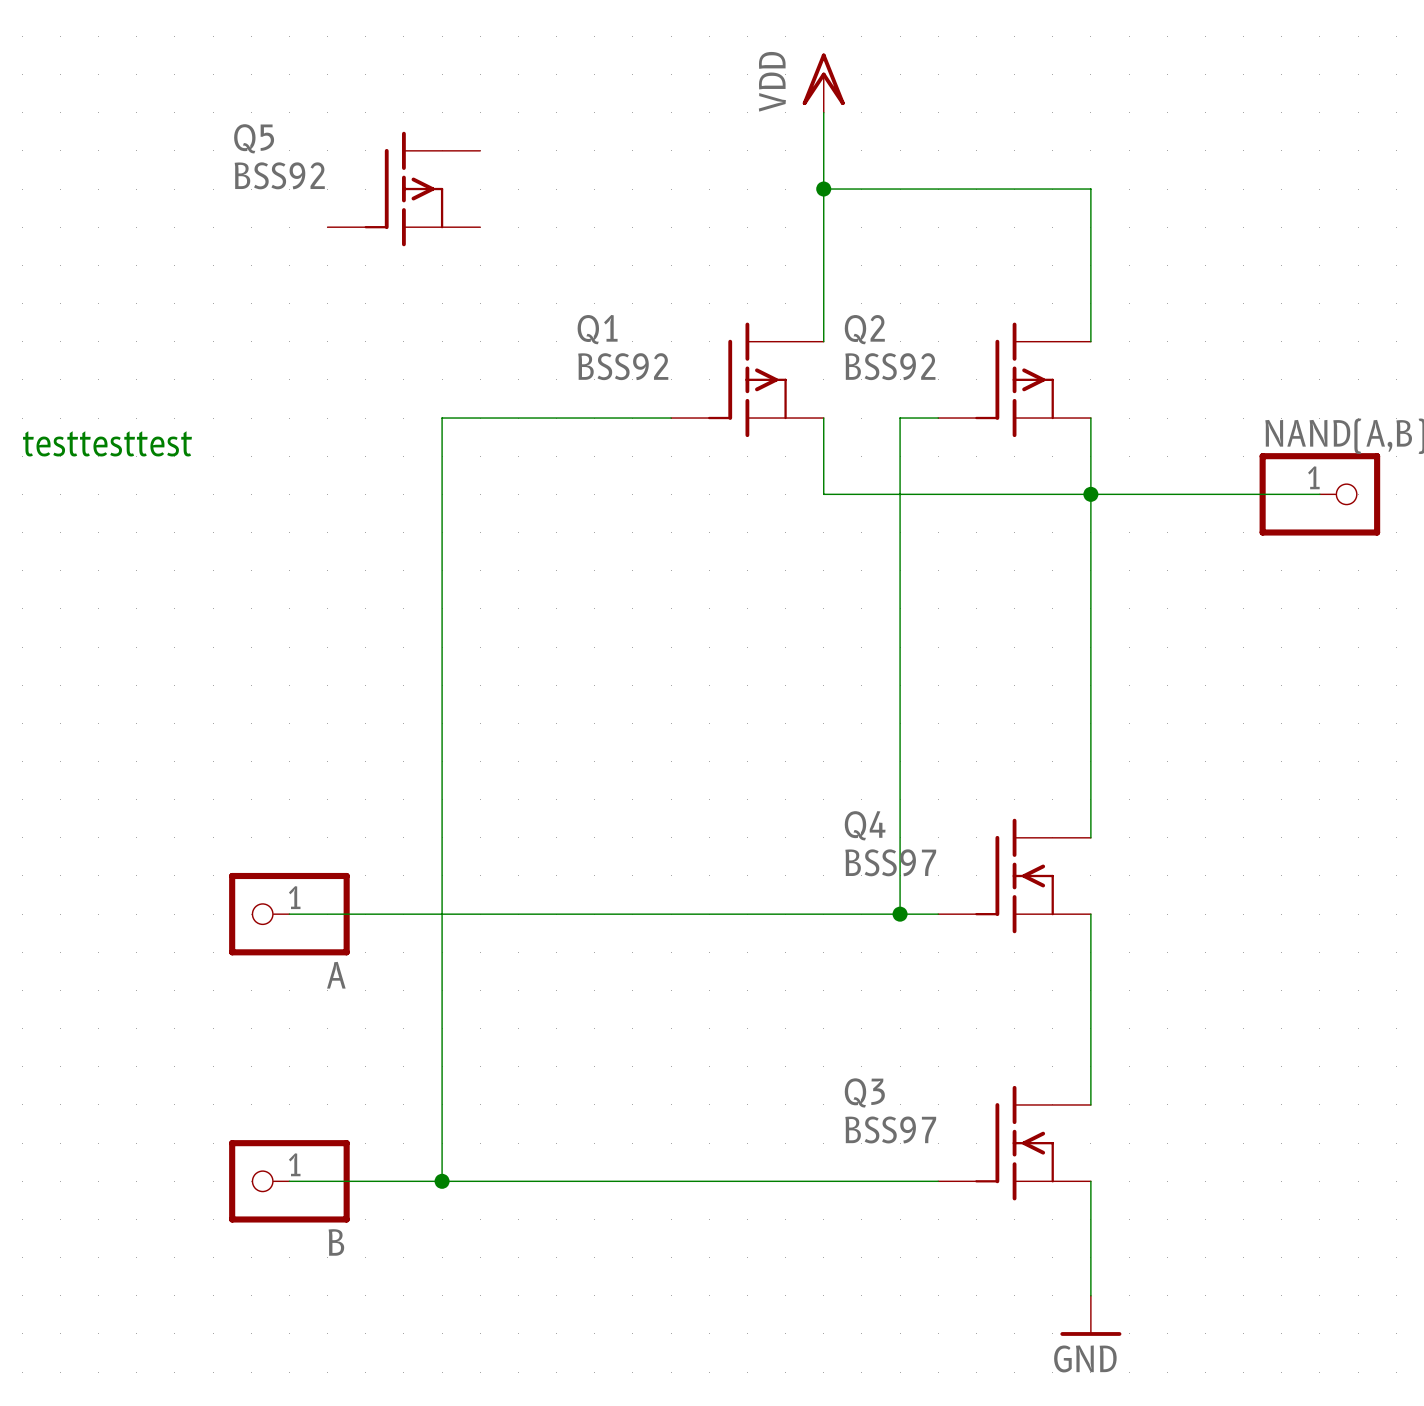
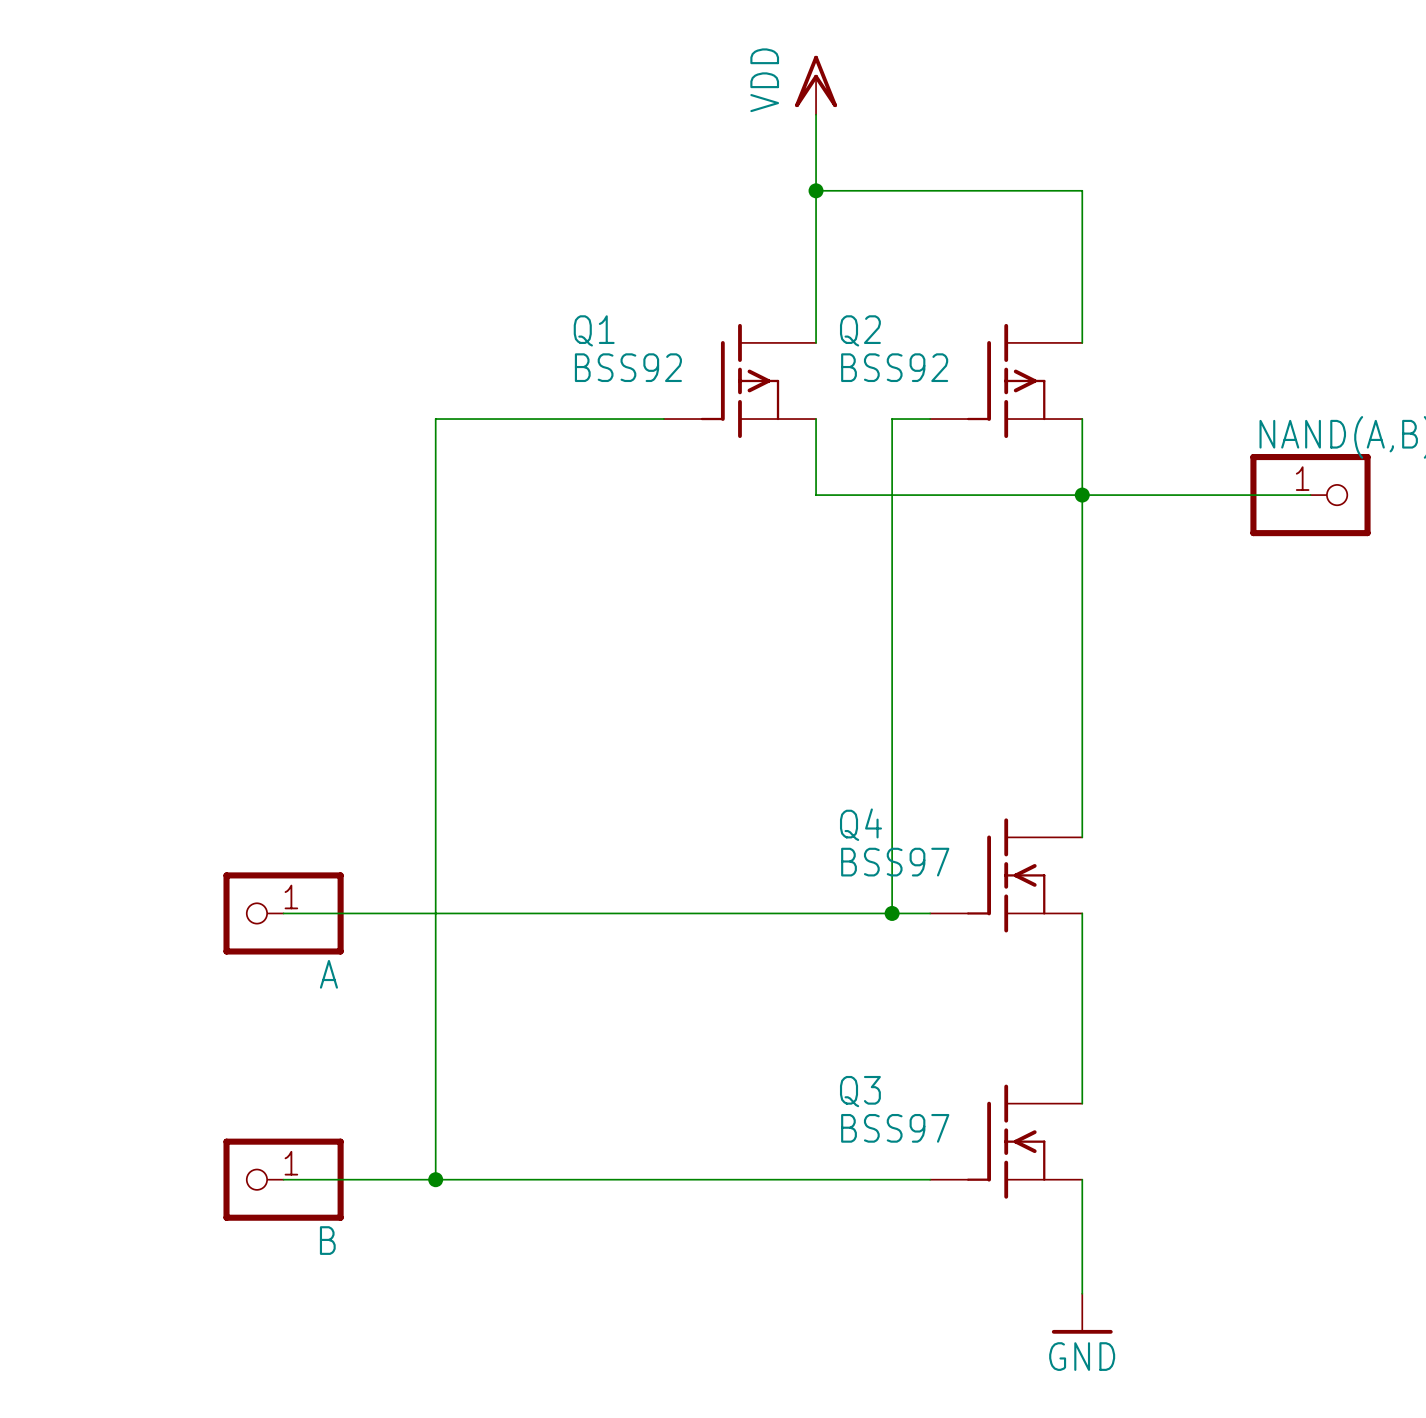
Q5: BSS92 (403, 189) -> none
text: testtesttest (107, 443) -> none

